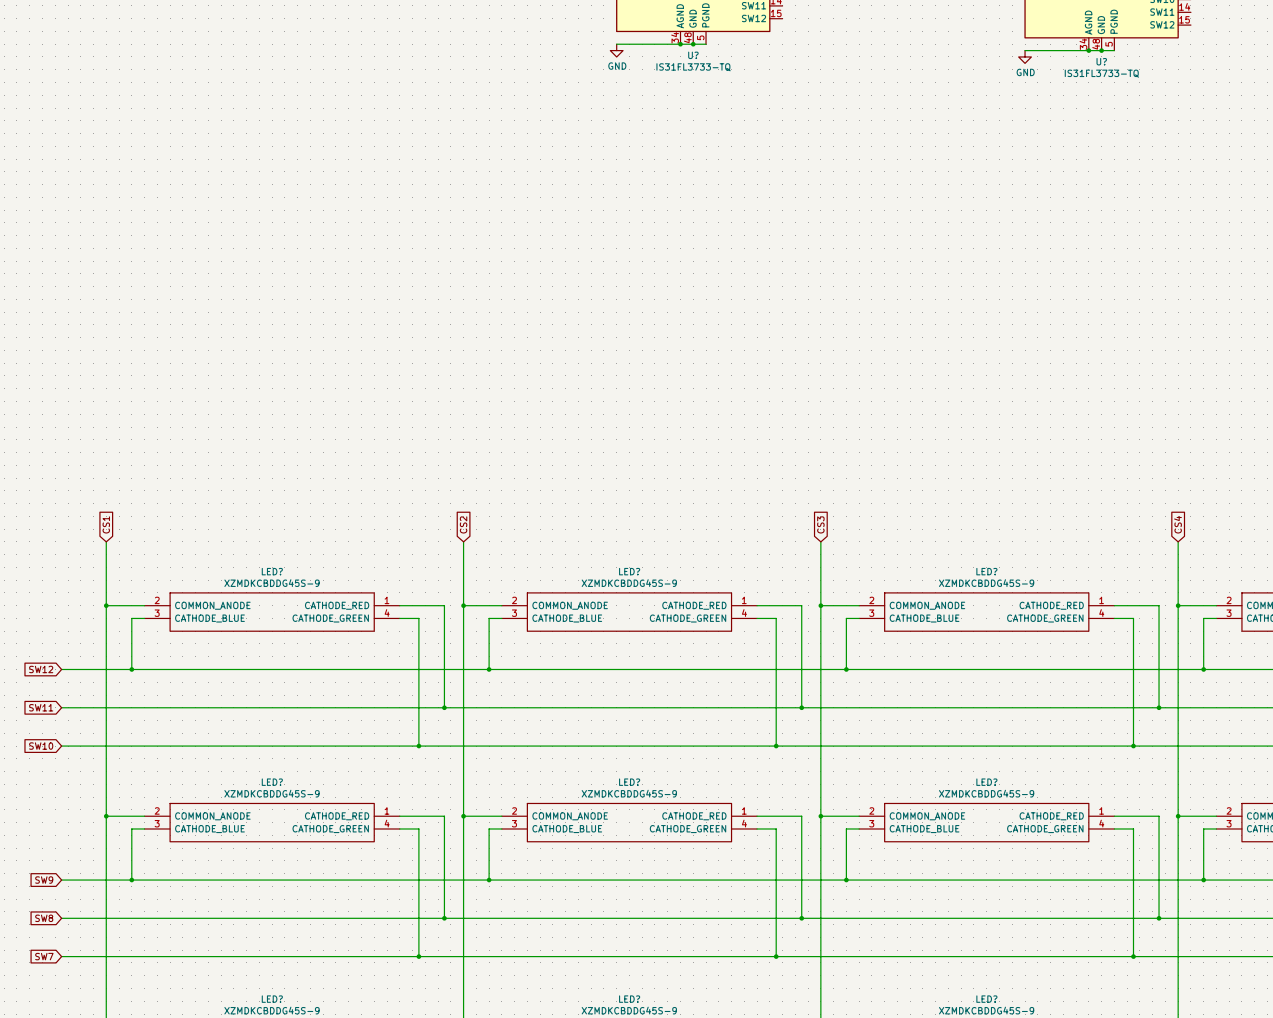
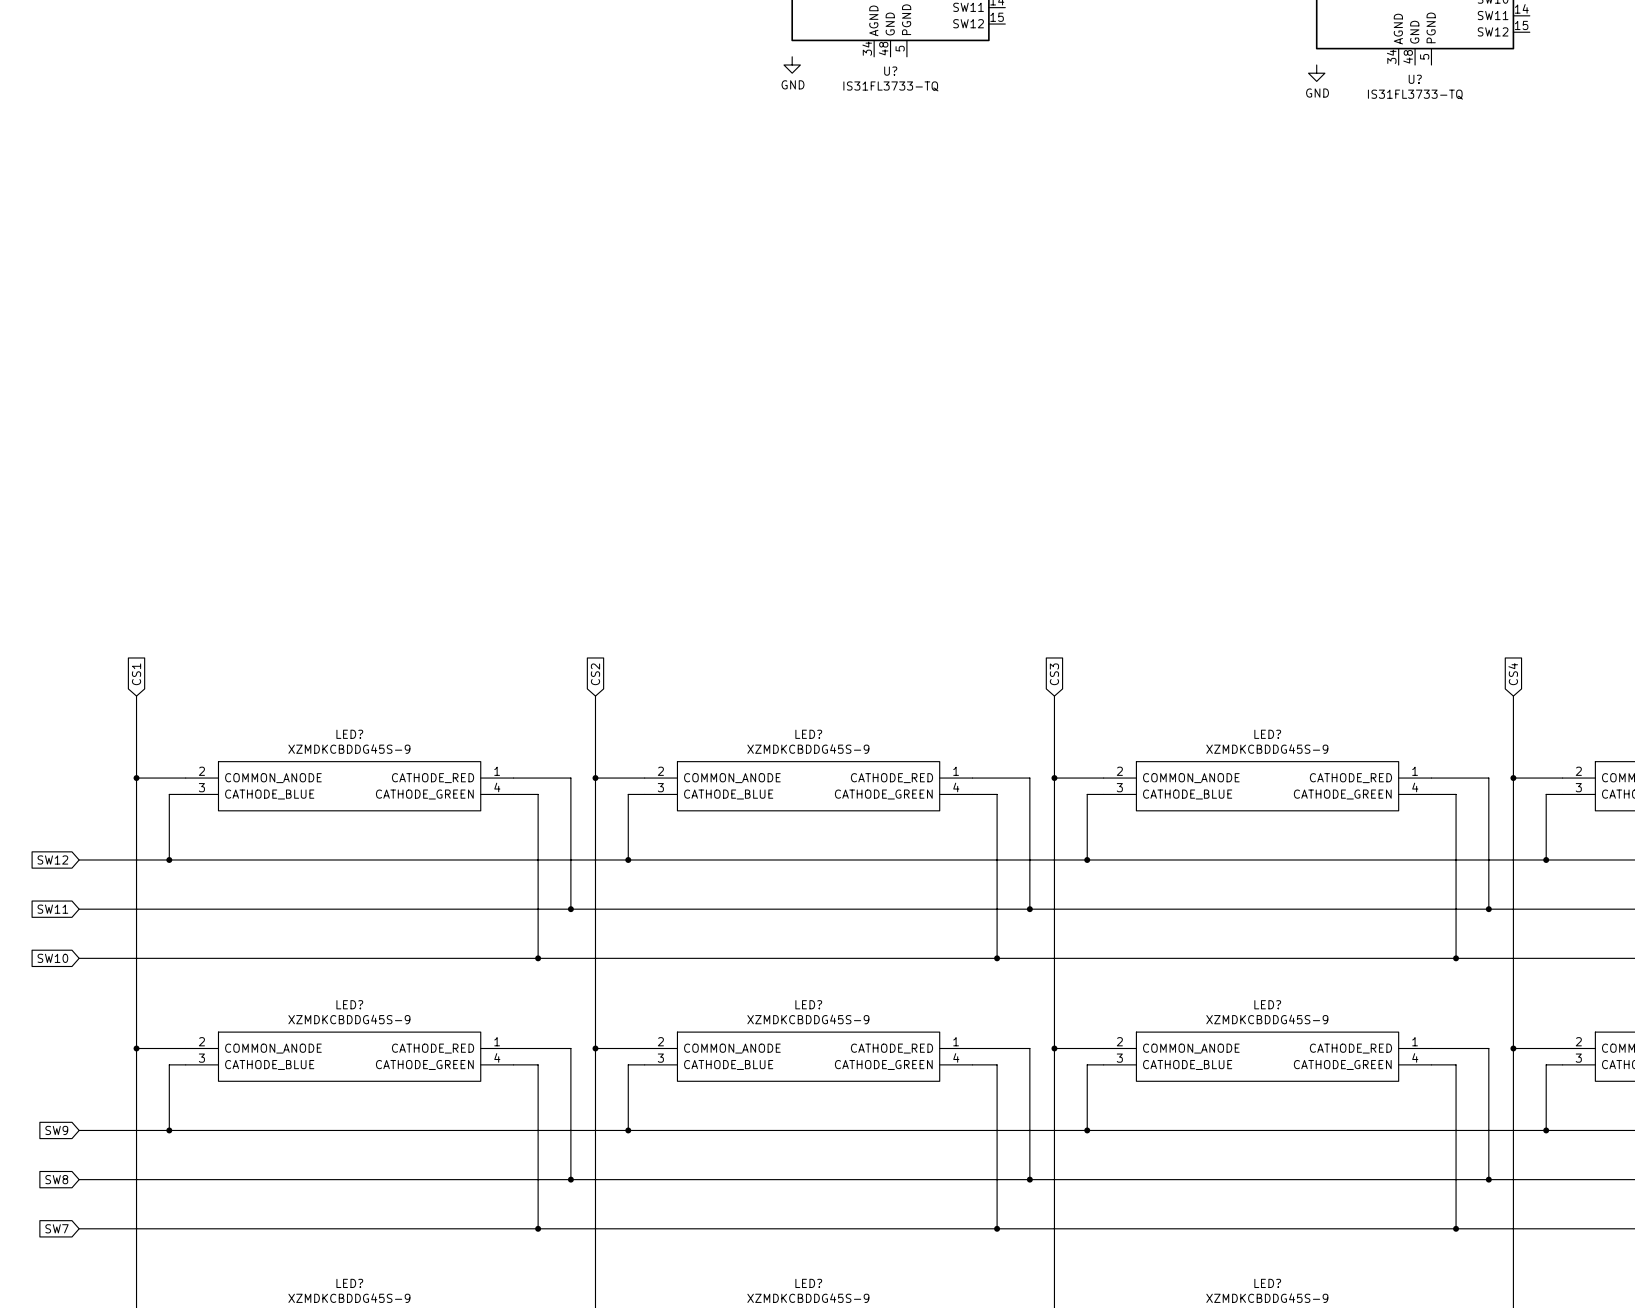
wire: (616, 44) (706, 44) -> none
junction: (680, 44) -> none
junction: (693, 44) -> none
wire: (1025, 50) (1114, 50) -> none
junction: (1088, 50) -> none
junction: (1101, 50) -> none

